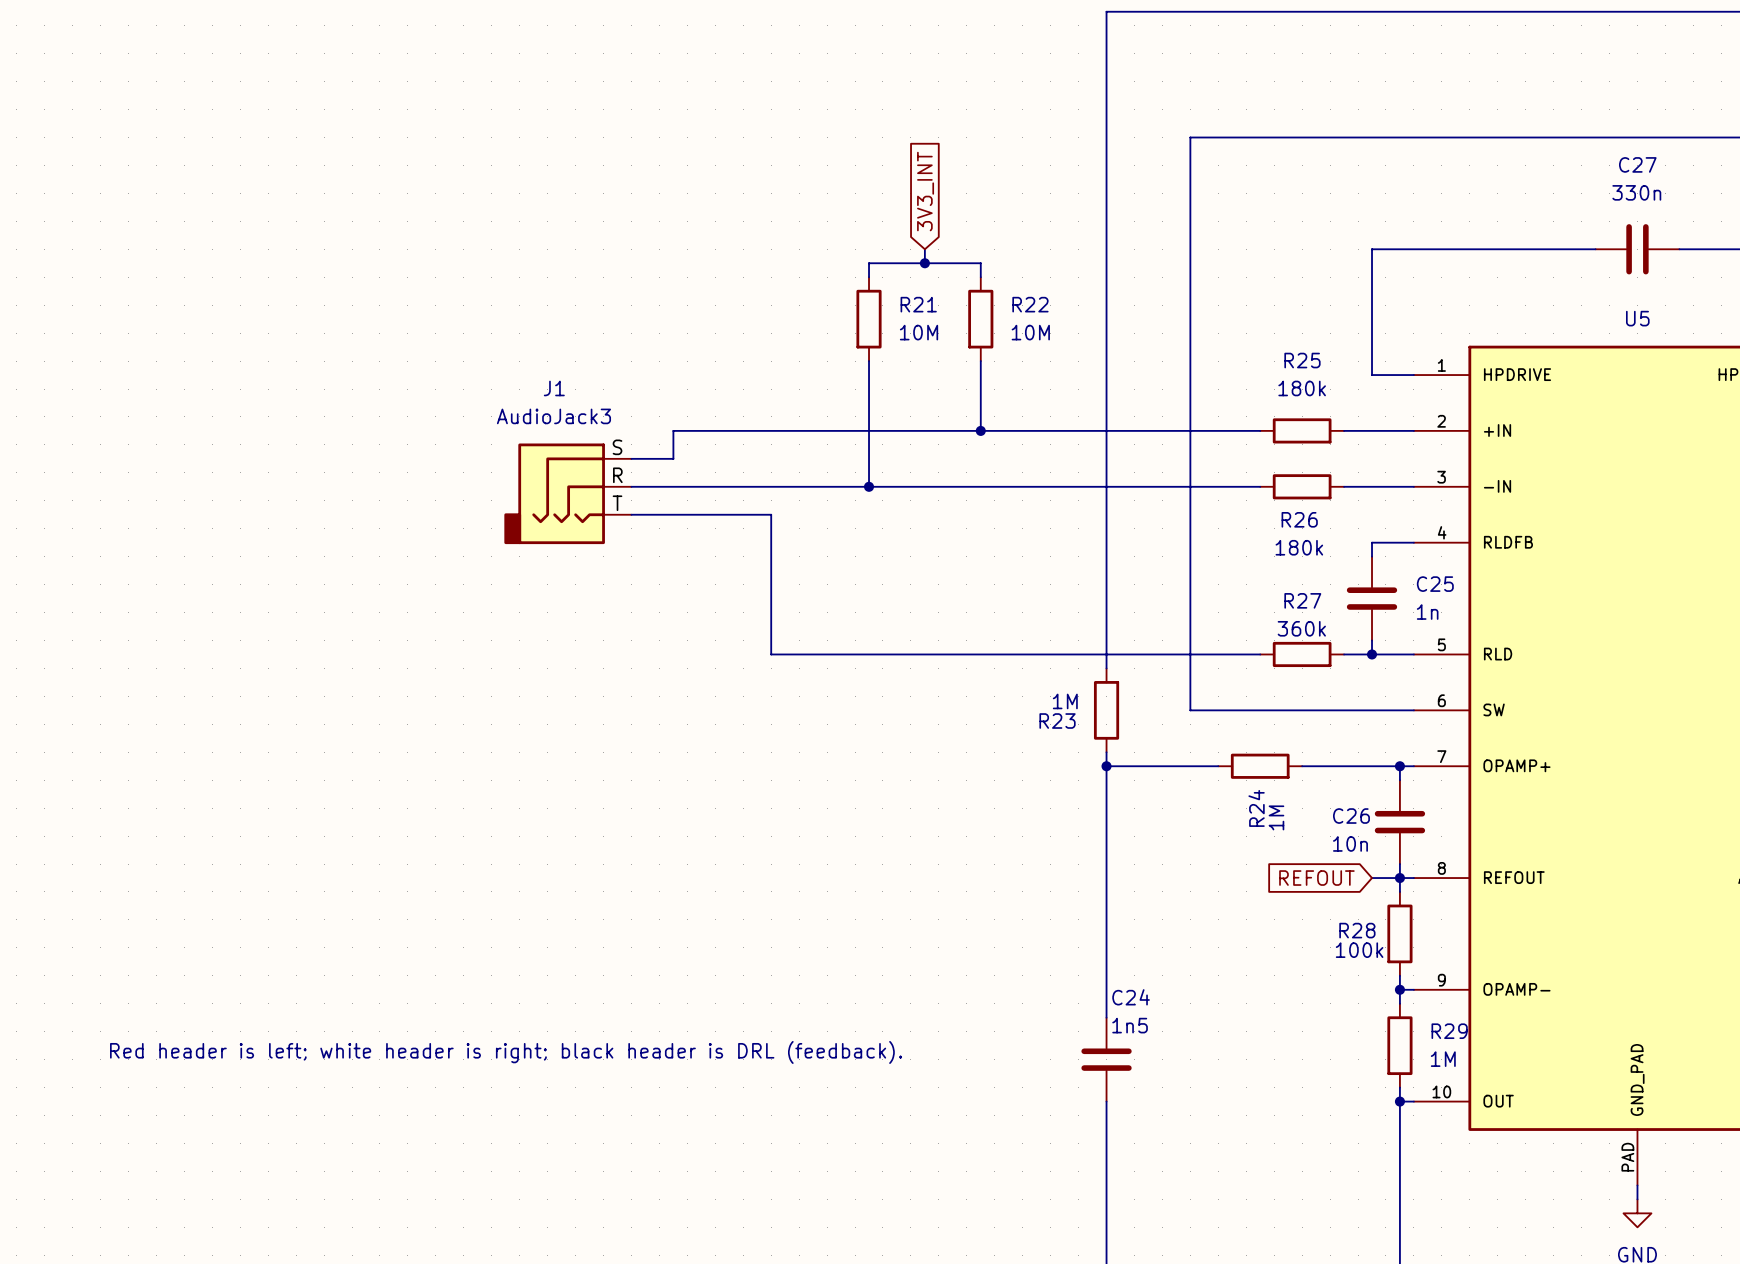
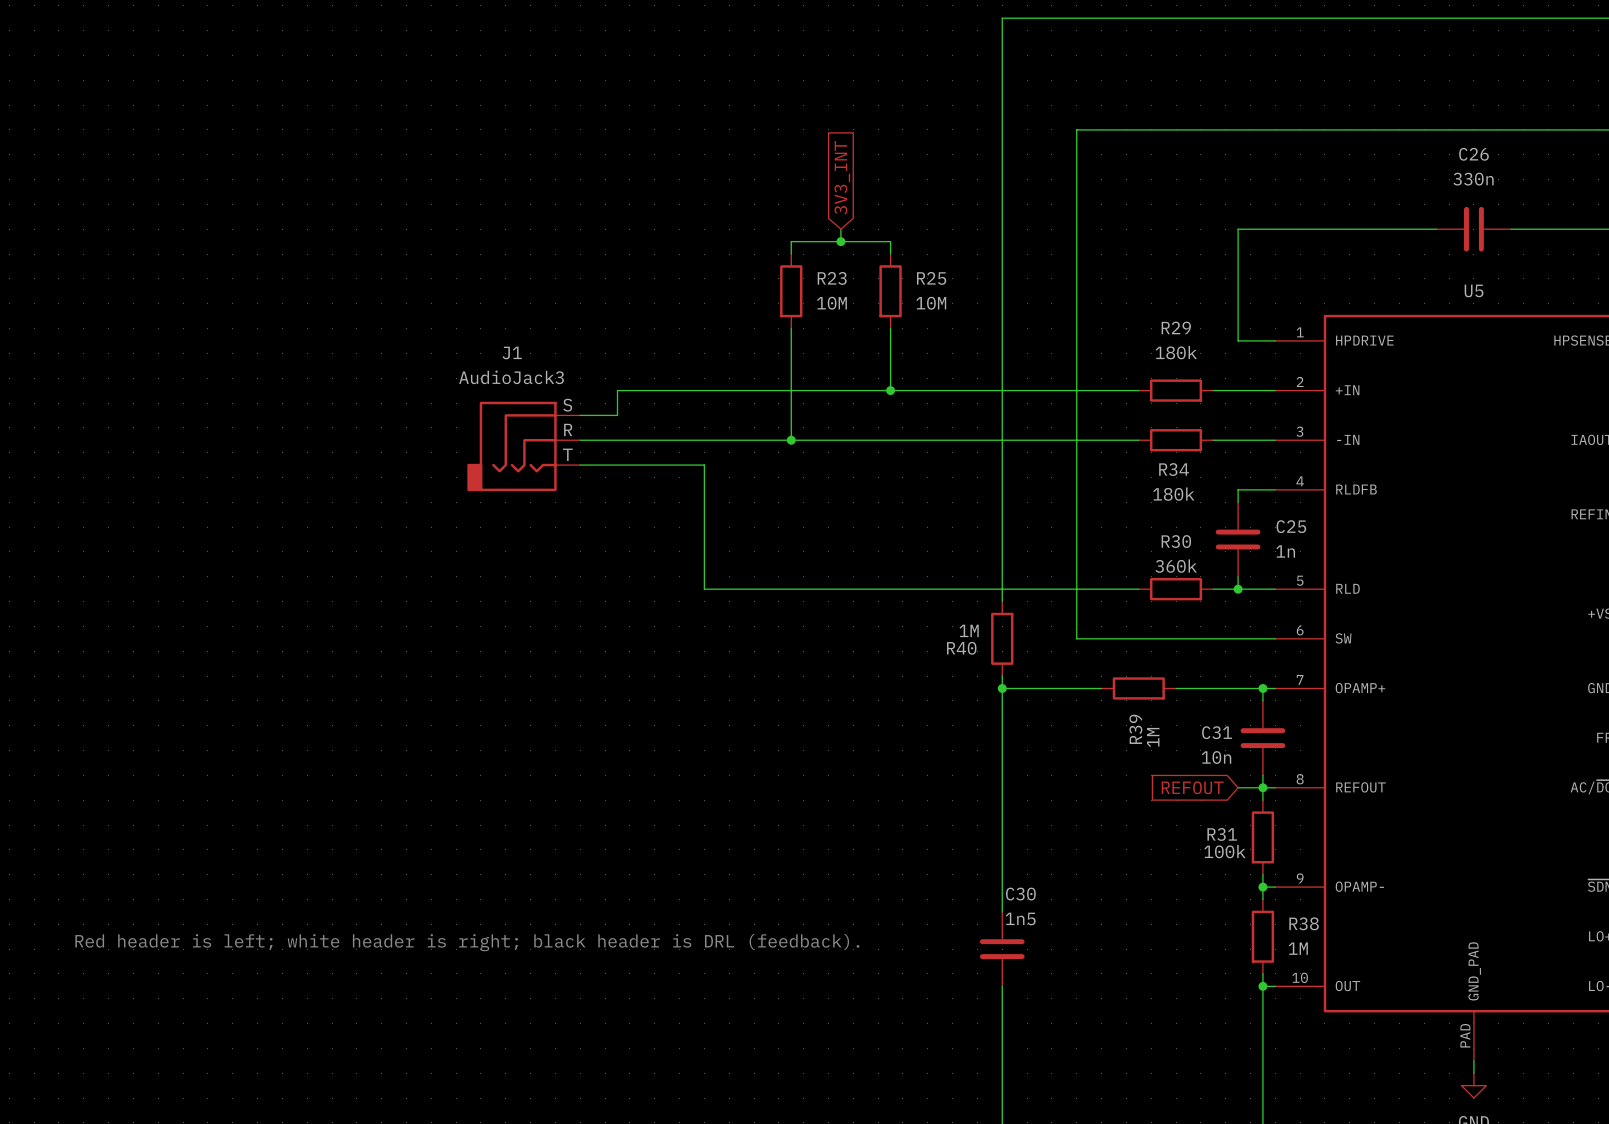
C27 name: C27 (1637, 164) -> C26 (1473, 154)
R21 name: R21 (918, 304) -> R23 (832, 278)
R22 name: R22 (1030, 304) -> R25 (931, 278)
R25 name: R25 (1302, 360) -> R29 (1176, 327)
R26 name: R26 (1299, 519) -> R34 (1174, 469)
R27 name: R27 (1302, 600) -> R30 (1176, 541)
R23 name: R23 (1057, 721) -> R40 (961, 648)
R24 name: R24 (1256, 808) -> R39 (1135, 729)
C26 name: C26 (1351, 816) -> C31 (1217, 732)
R28 name: R28 (1357, 930) -> R31 (1222, 834)
C24 name: C24 (1131, 997) -> C30 (1020, 894)
R29 name: R29 (1449, 1031) -> R38 (1304, 923)

